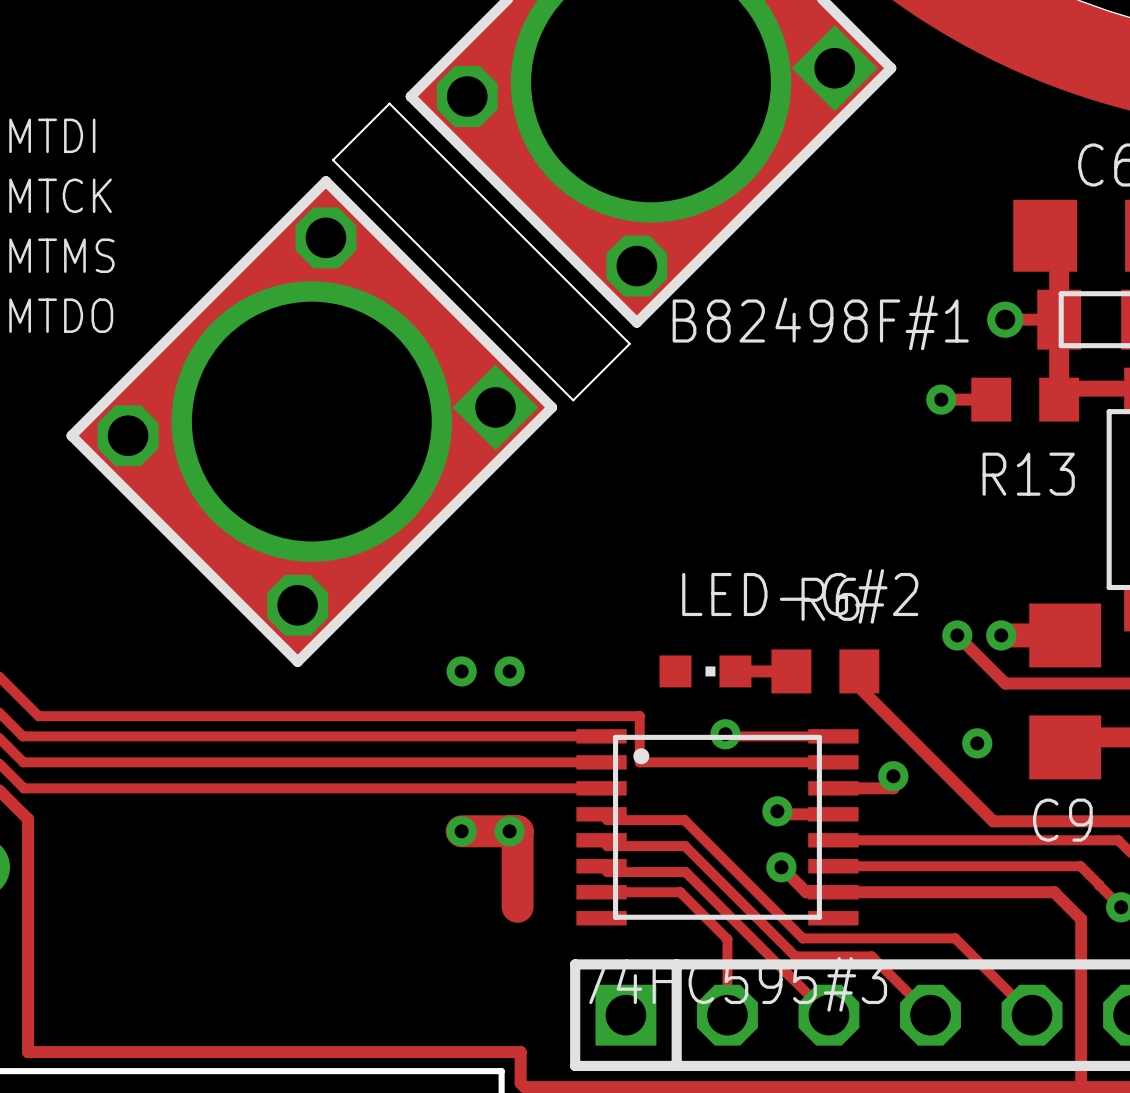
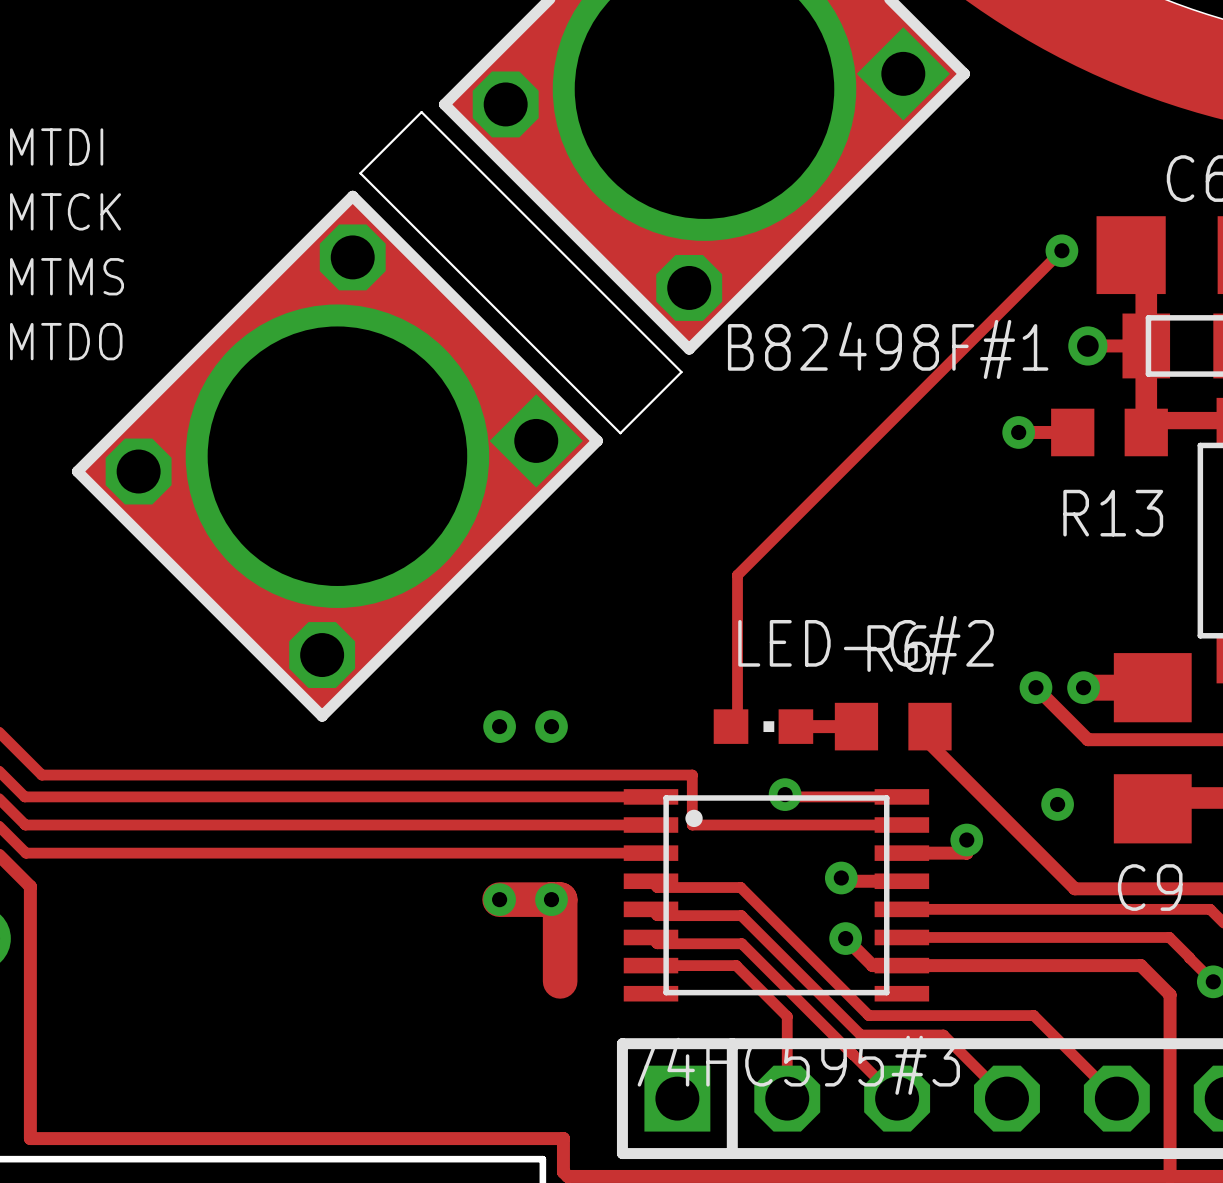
track: none -> (1061, 250) (737, 575) (737, 726) (731, 726)
via: none -> (1061, 250)

